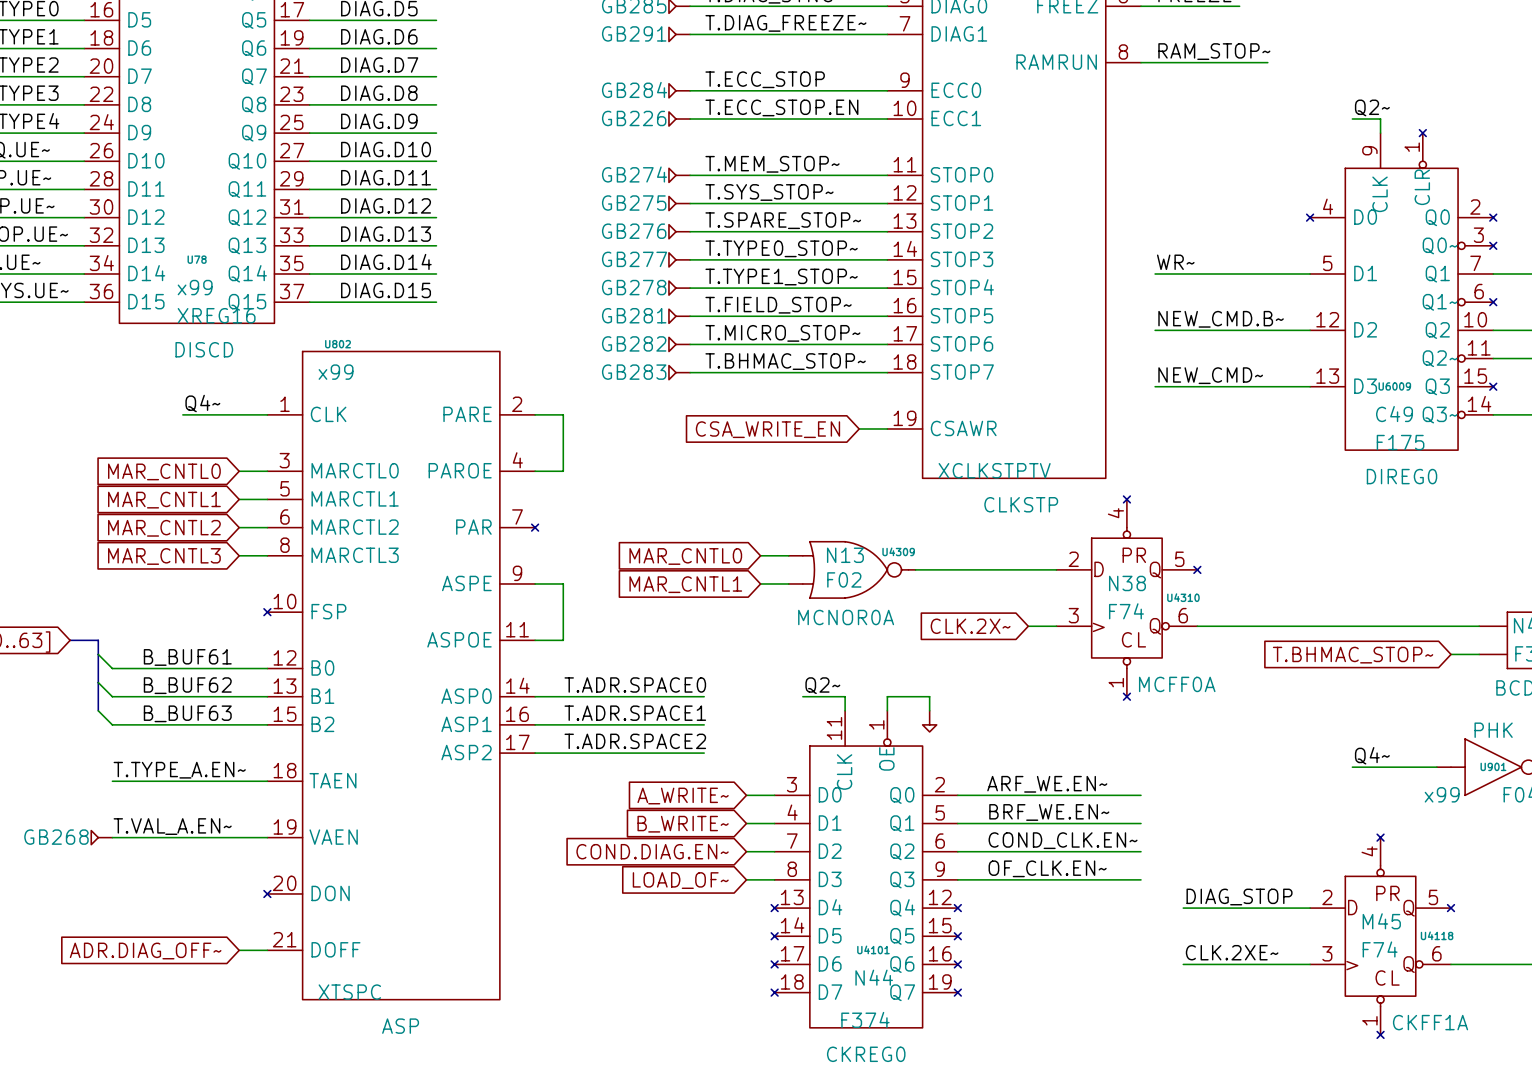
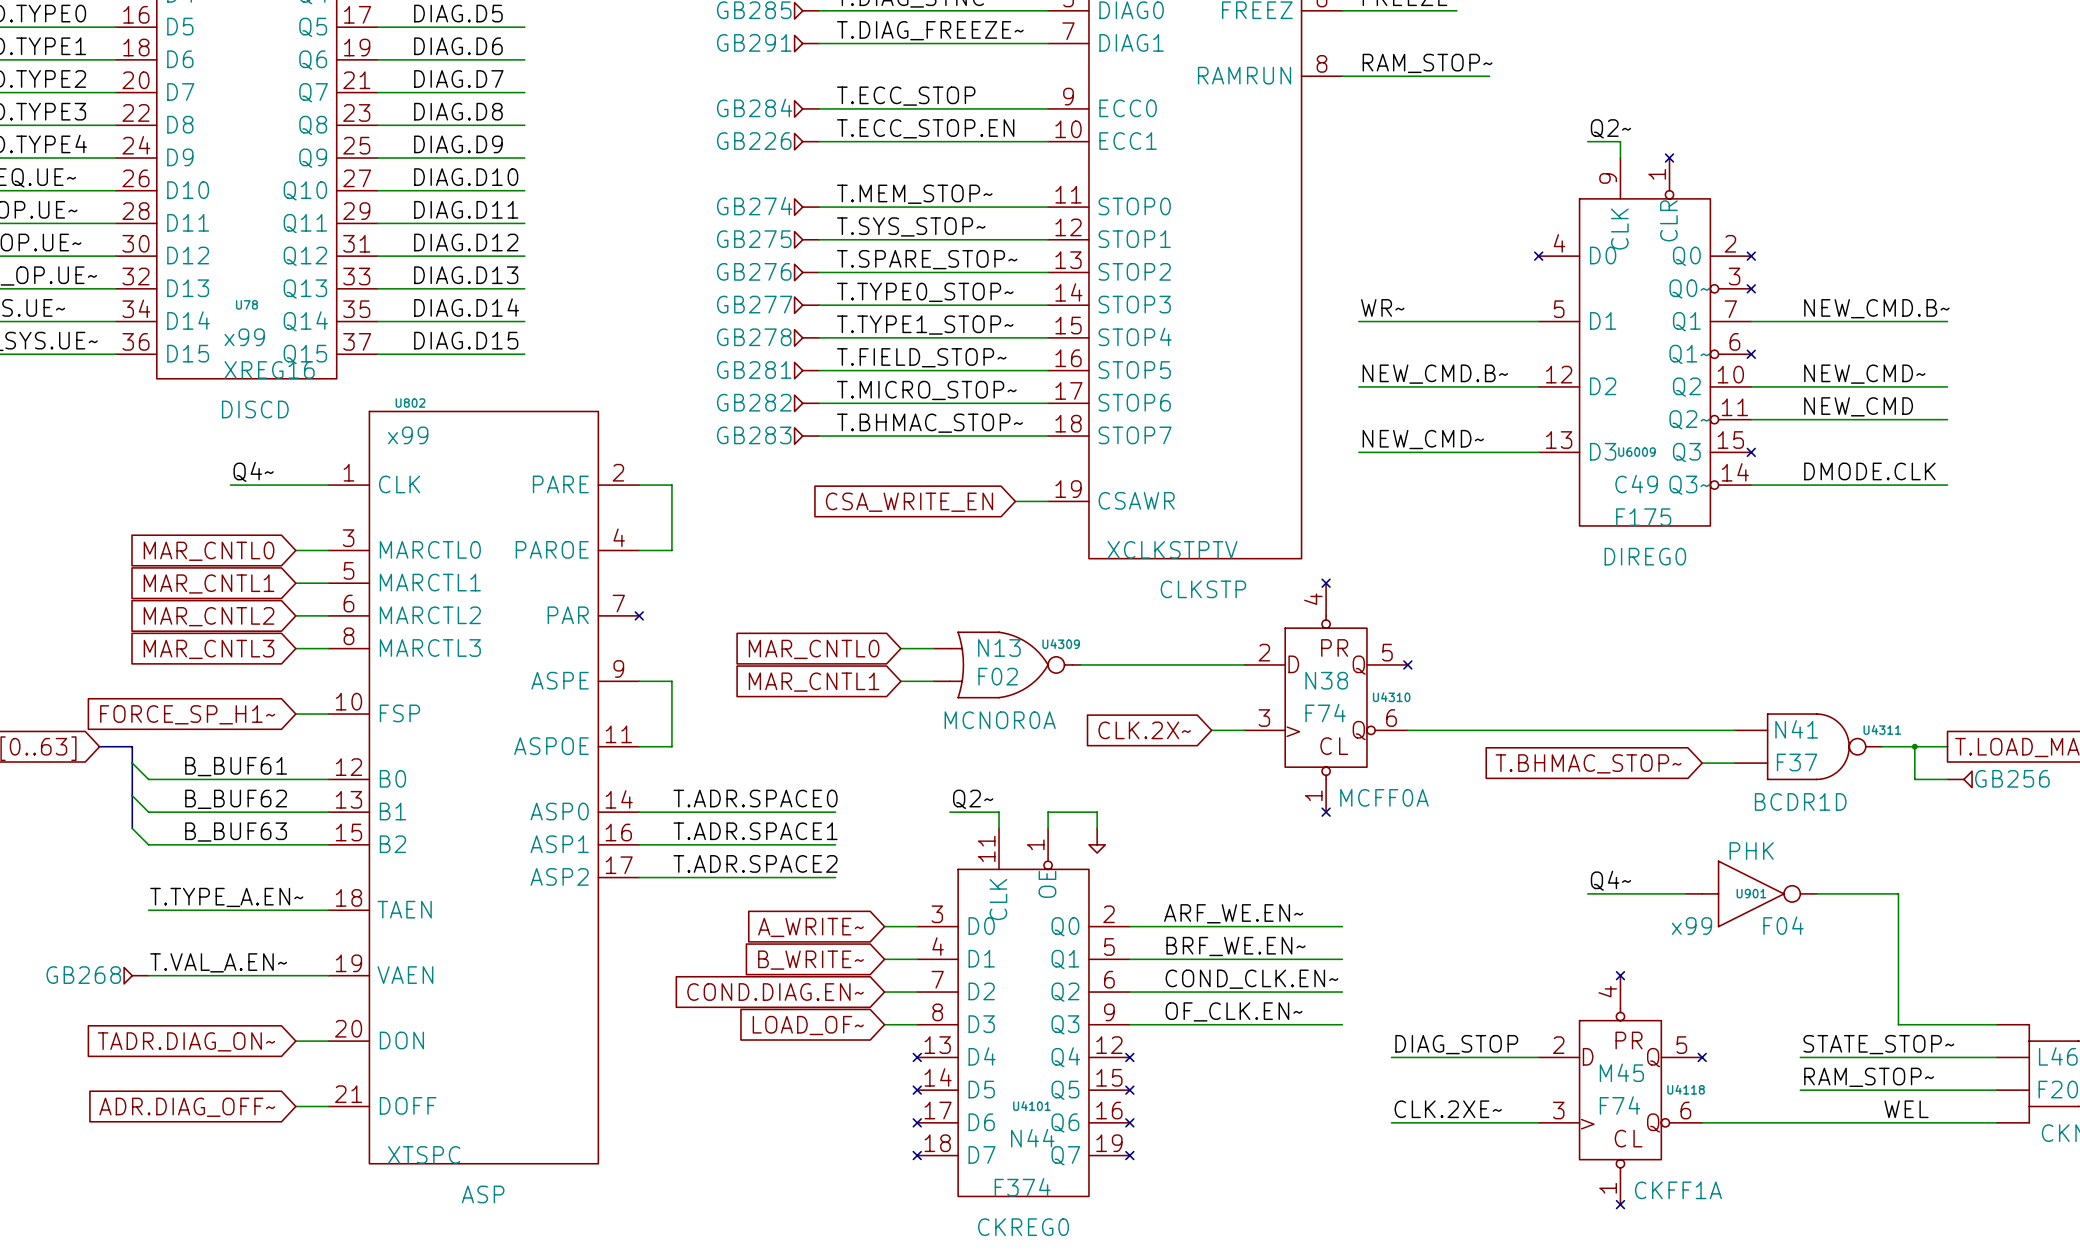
global label: none -> FORCE_SP_H1~ (187, 714)
wire: none -> (295, 714) (328, 714)
no-connect mark: (267, 612) -> none
wire: none -> (295, 1041) (328, 1041)
no-connect mark: (267, 893) -> none
global label: none -> TADR.DIAG_ON~ (186, 1041)

